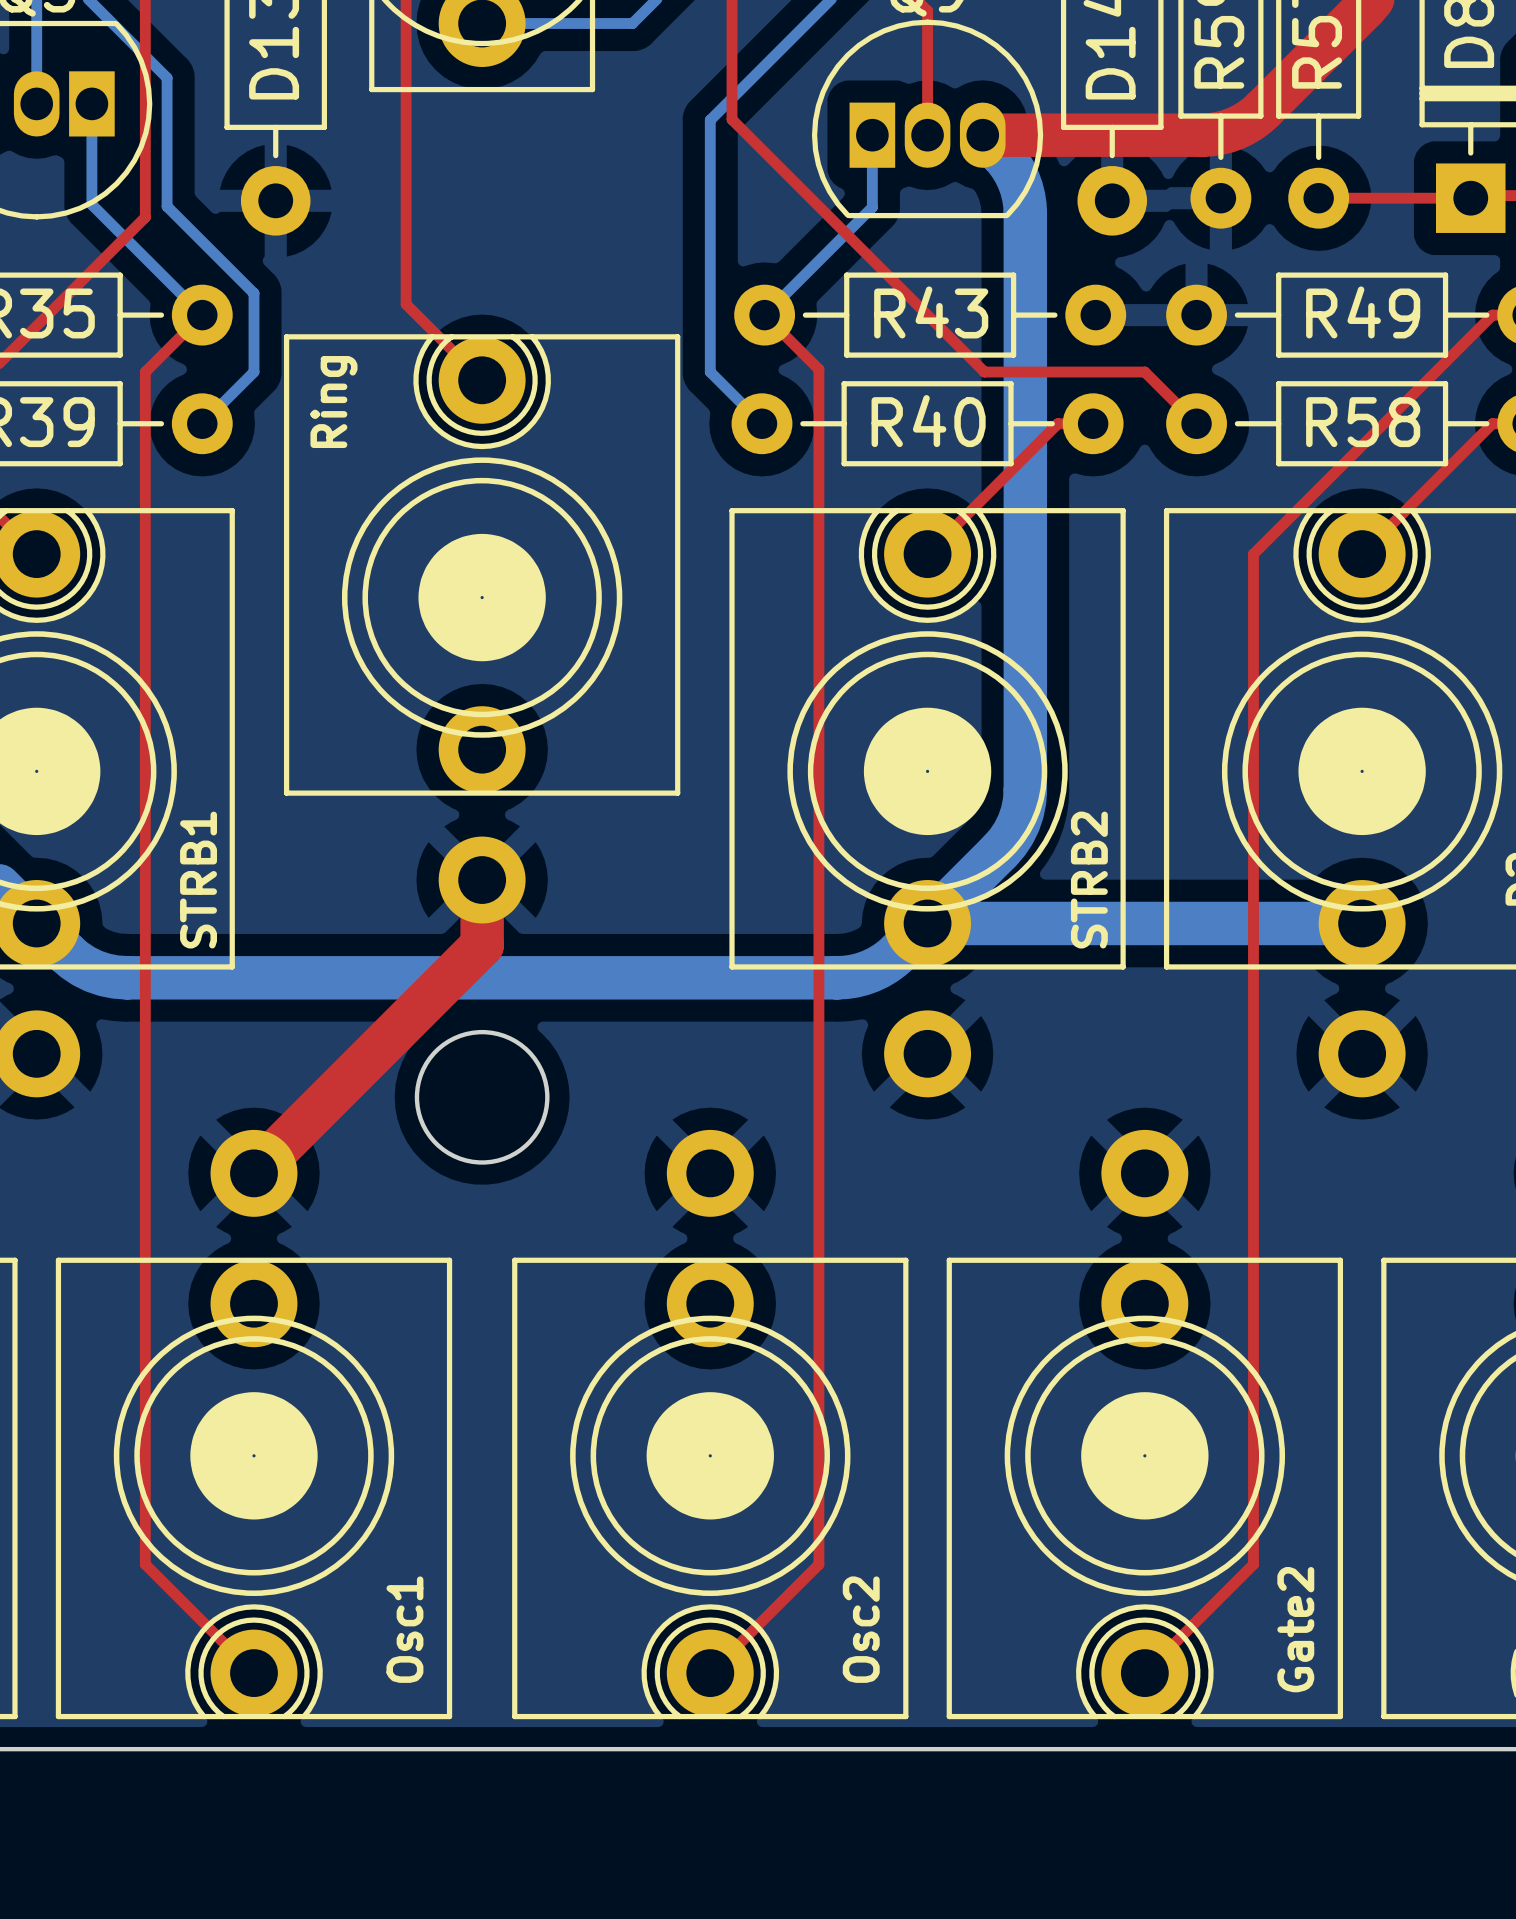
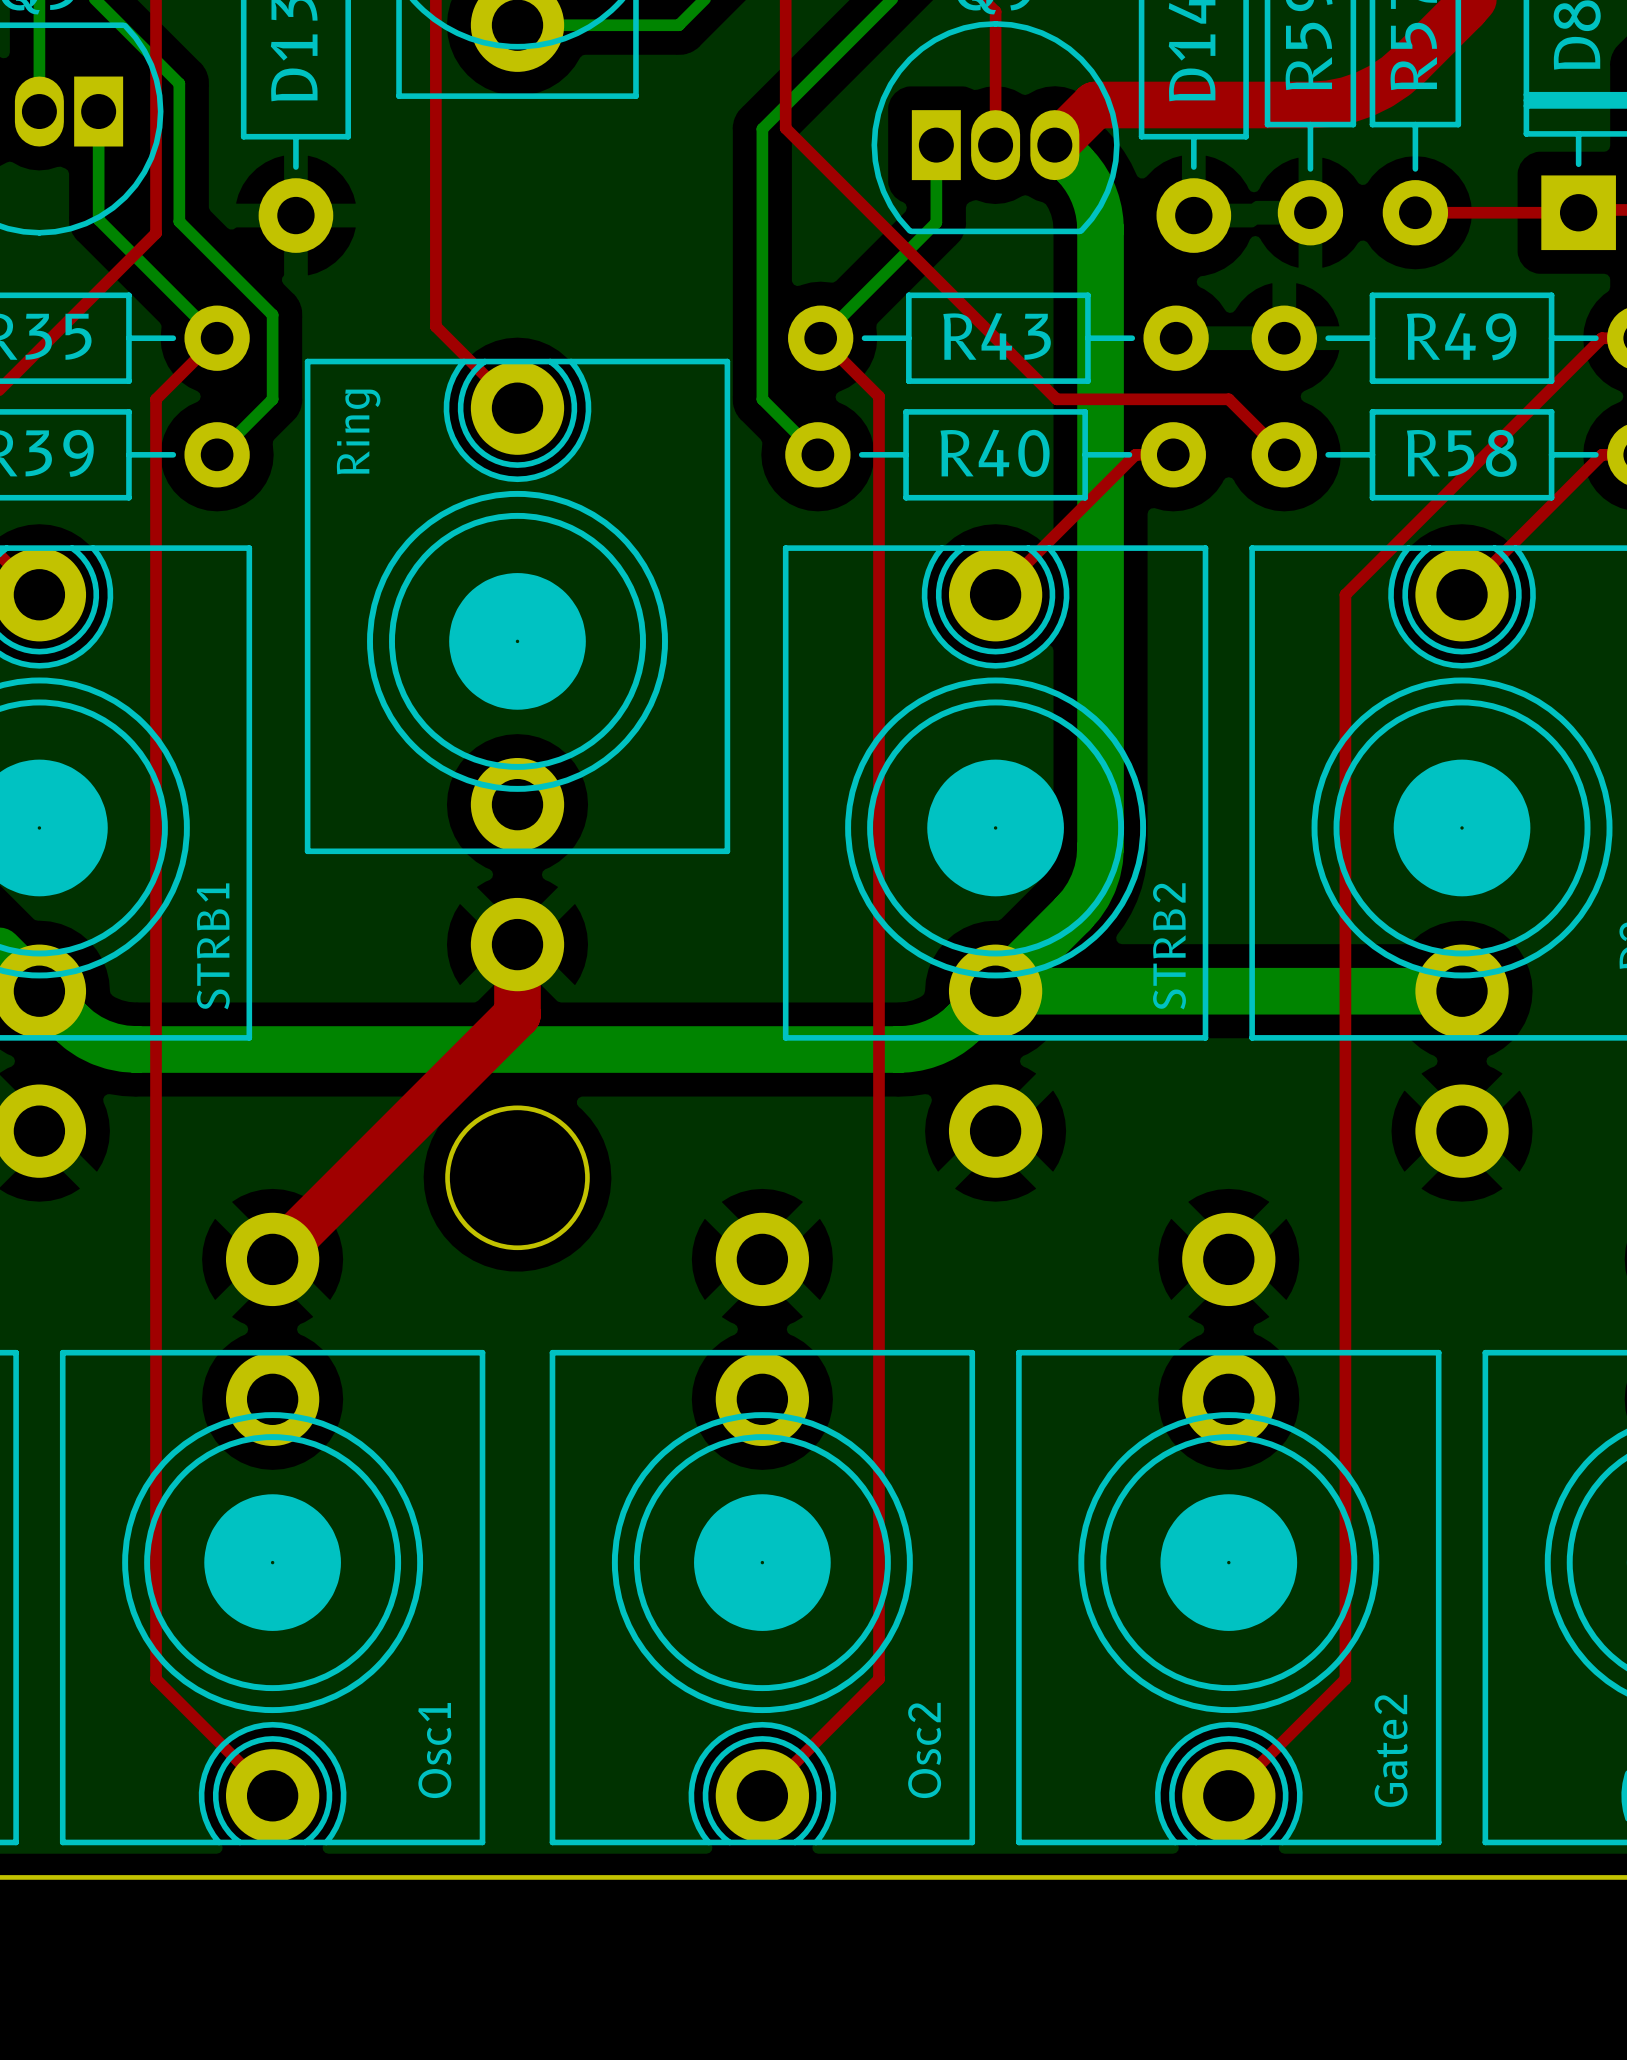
top track: (1313, 59) (1256, 115) (1235, 128) (1218, 133) (1201, 135) (982, 135) -> (1409, 64) (1380, 86) (1364, 94) (1329, 103) (1094, 105) (1054, 145)

